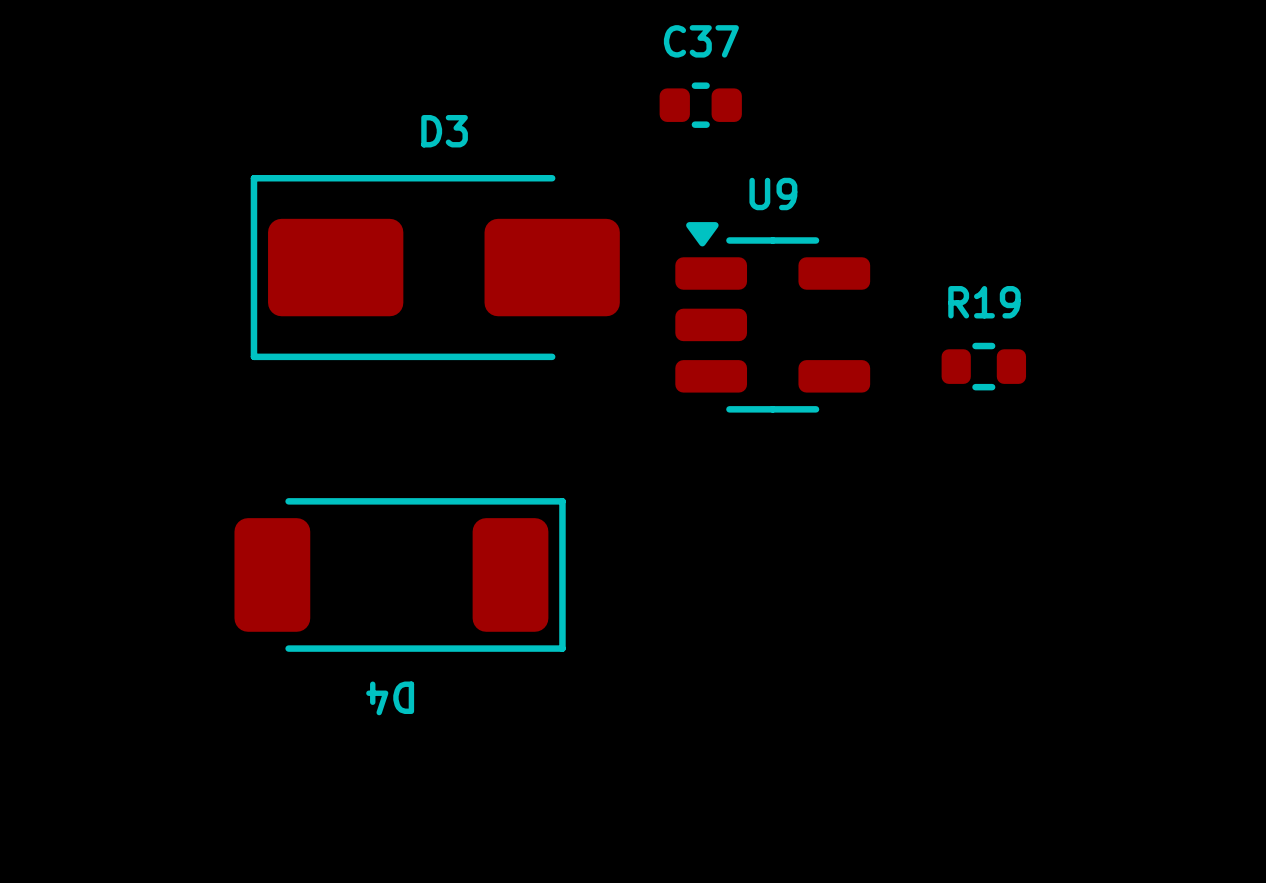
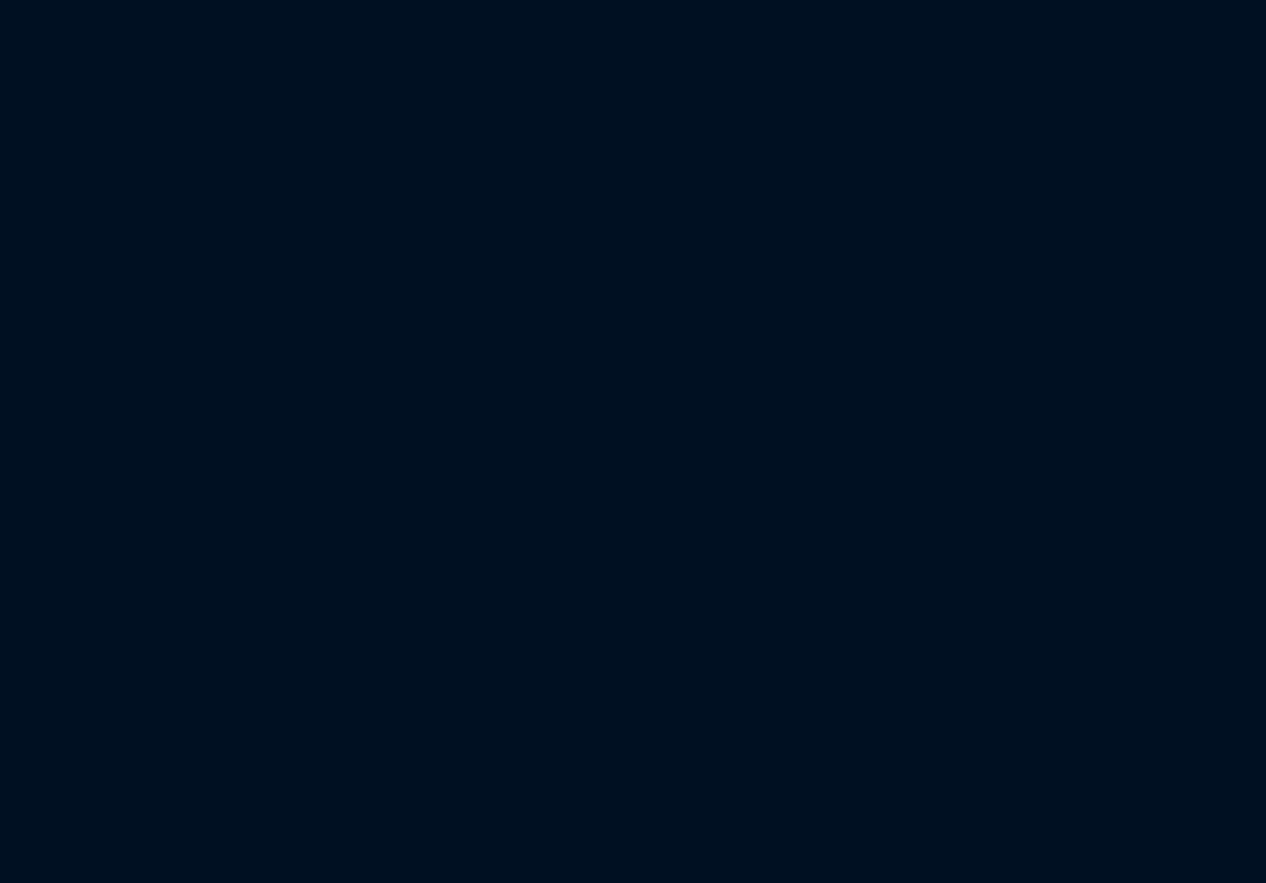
C37: (700, 105) -> none
D3: (435, 267) -> none
U9: (772, 317) -> none
R19: (983, 366) -> none
D4: (400, 574) -> none

